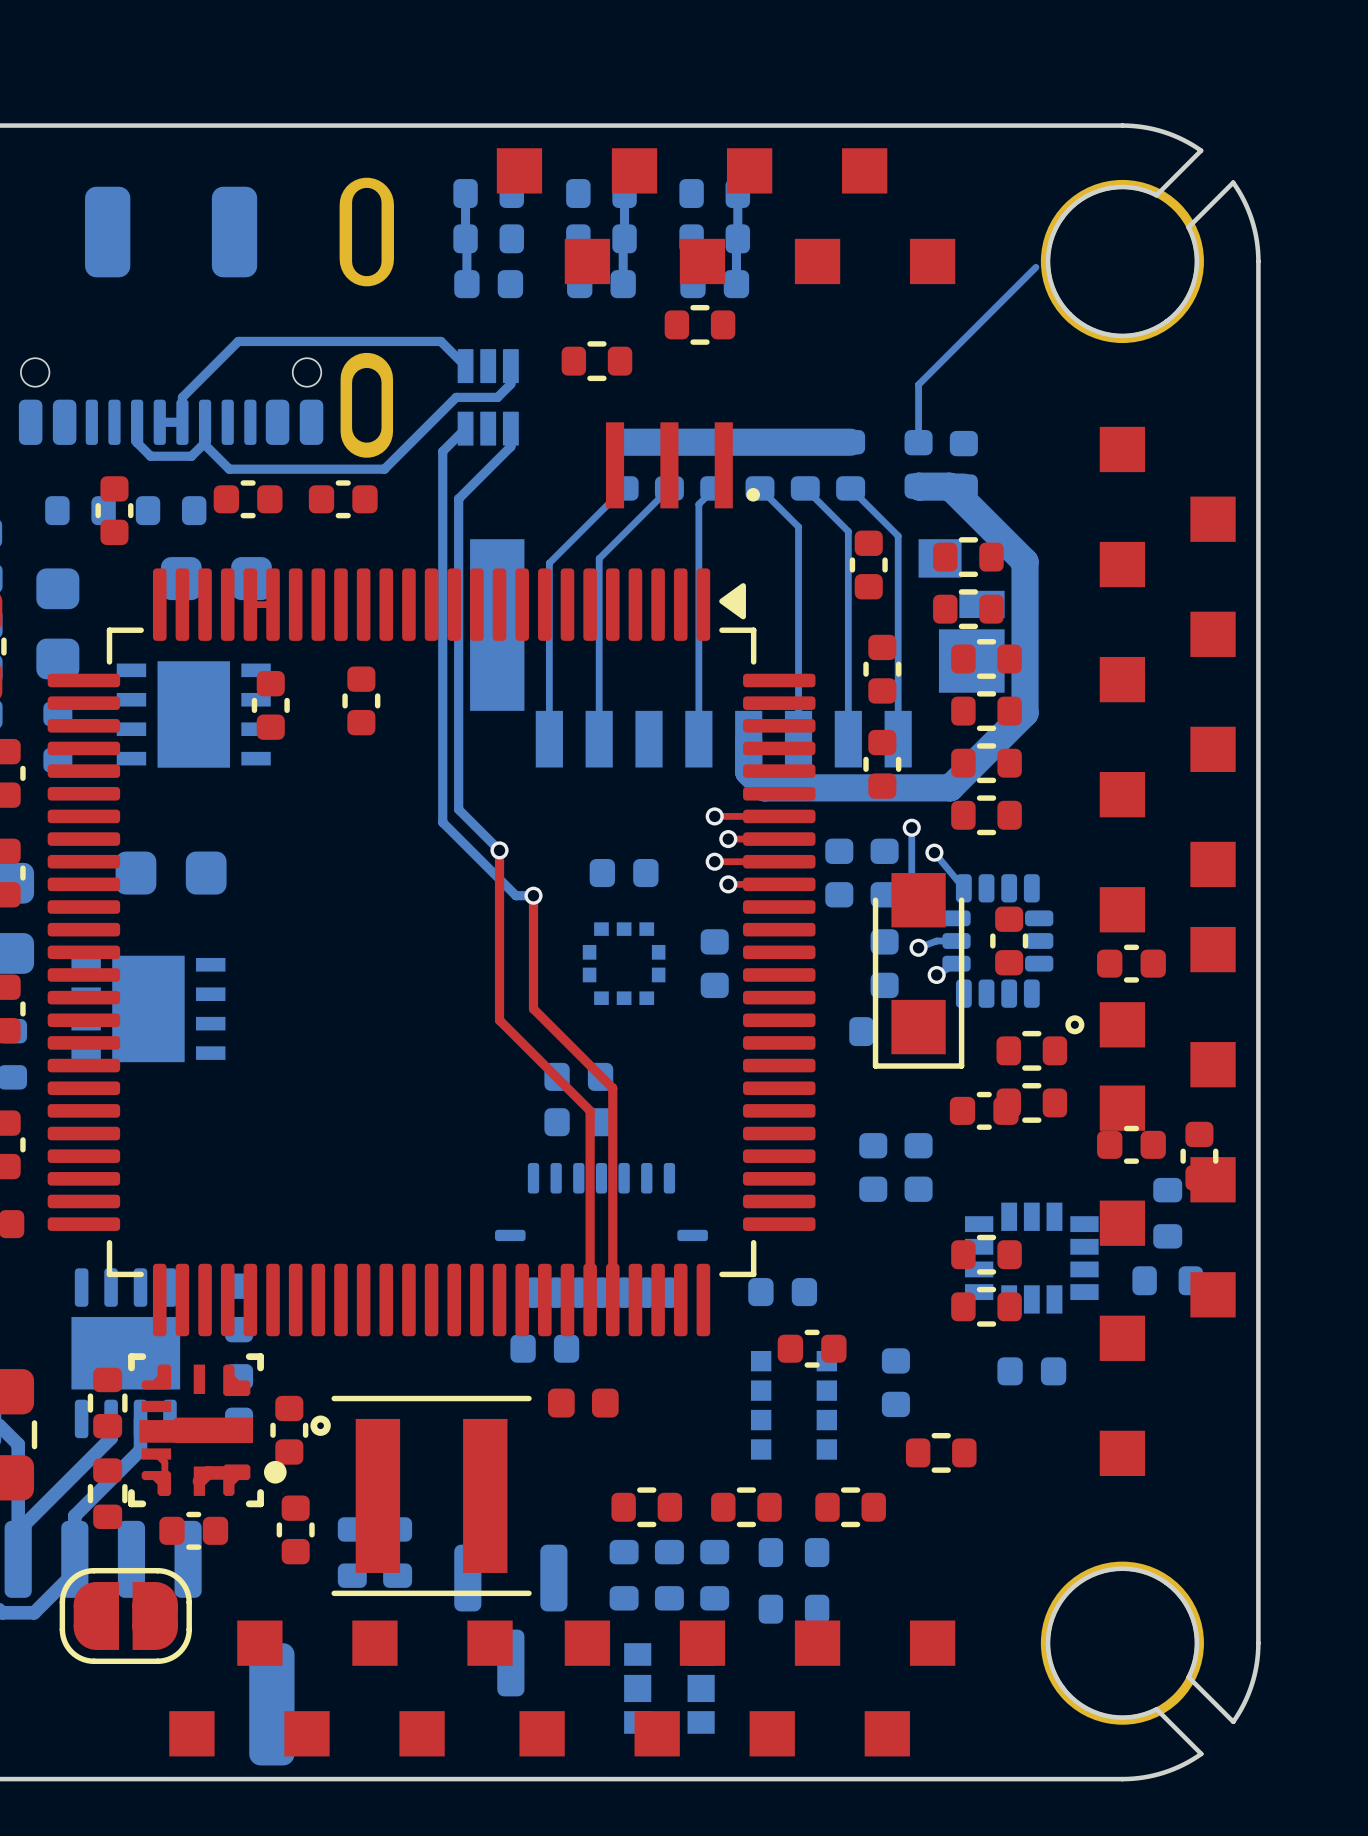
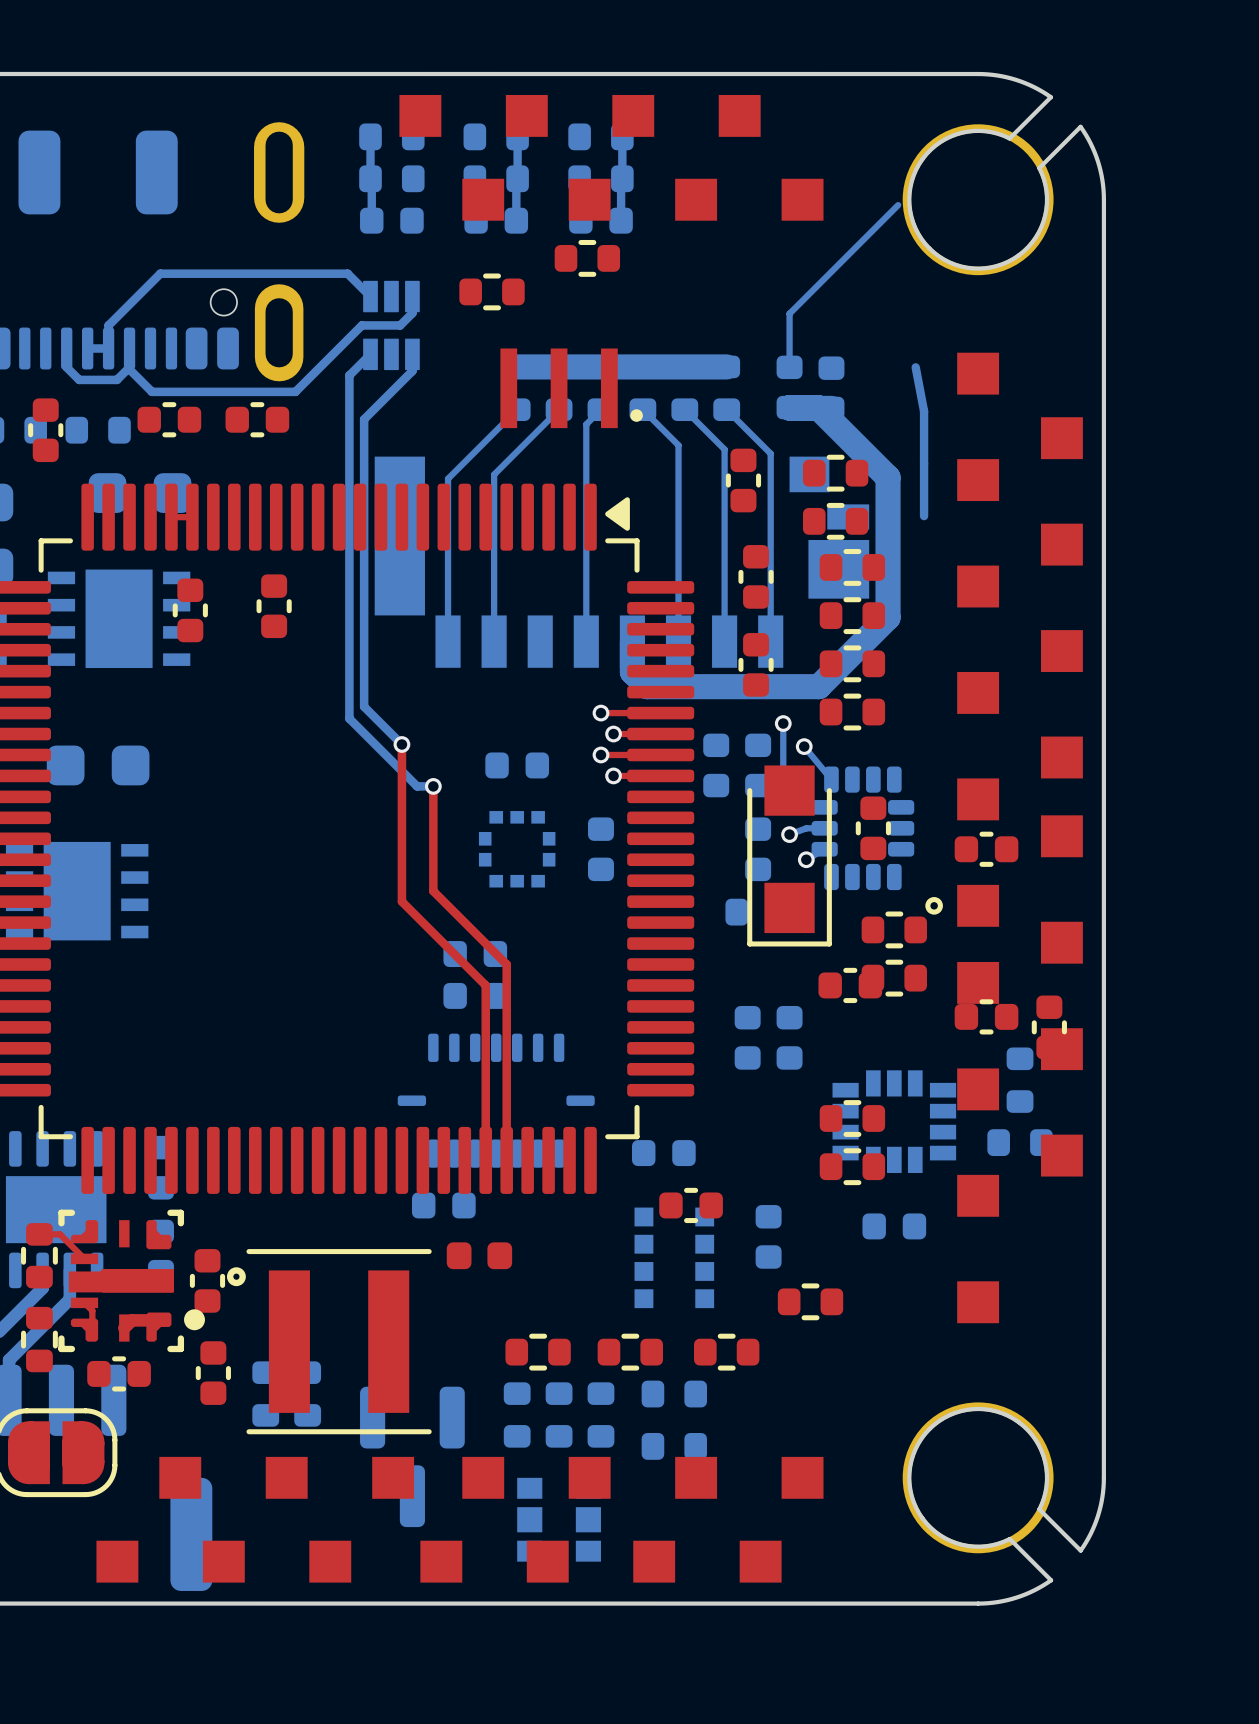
bottom track: none -> (915, 367) (924, 411) (924, 516)
top track: none -> (39, 1234) (59, 1234) (84, 1258)

